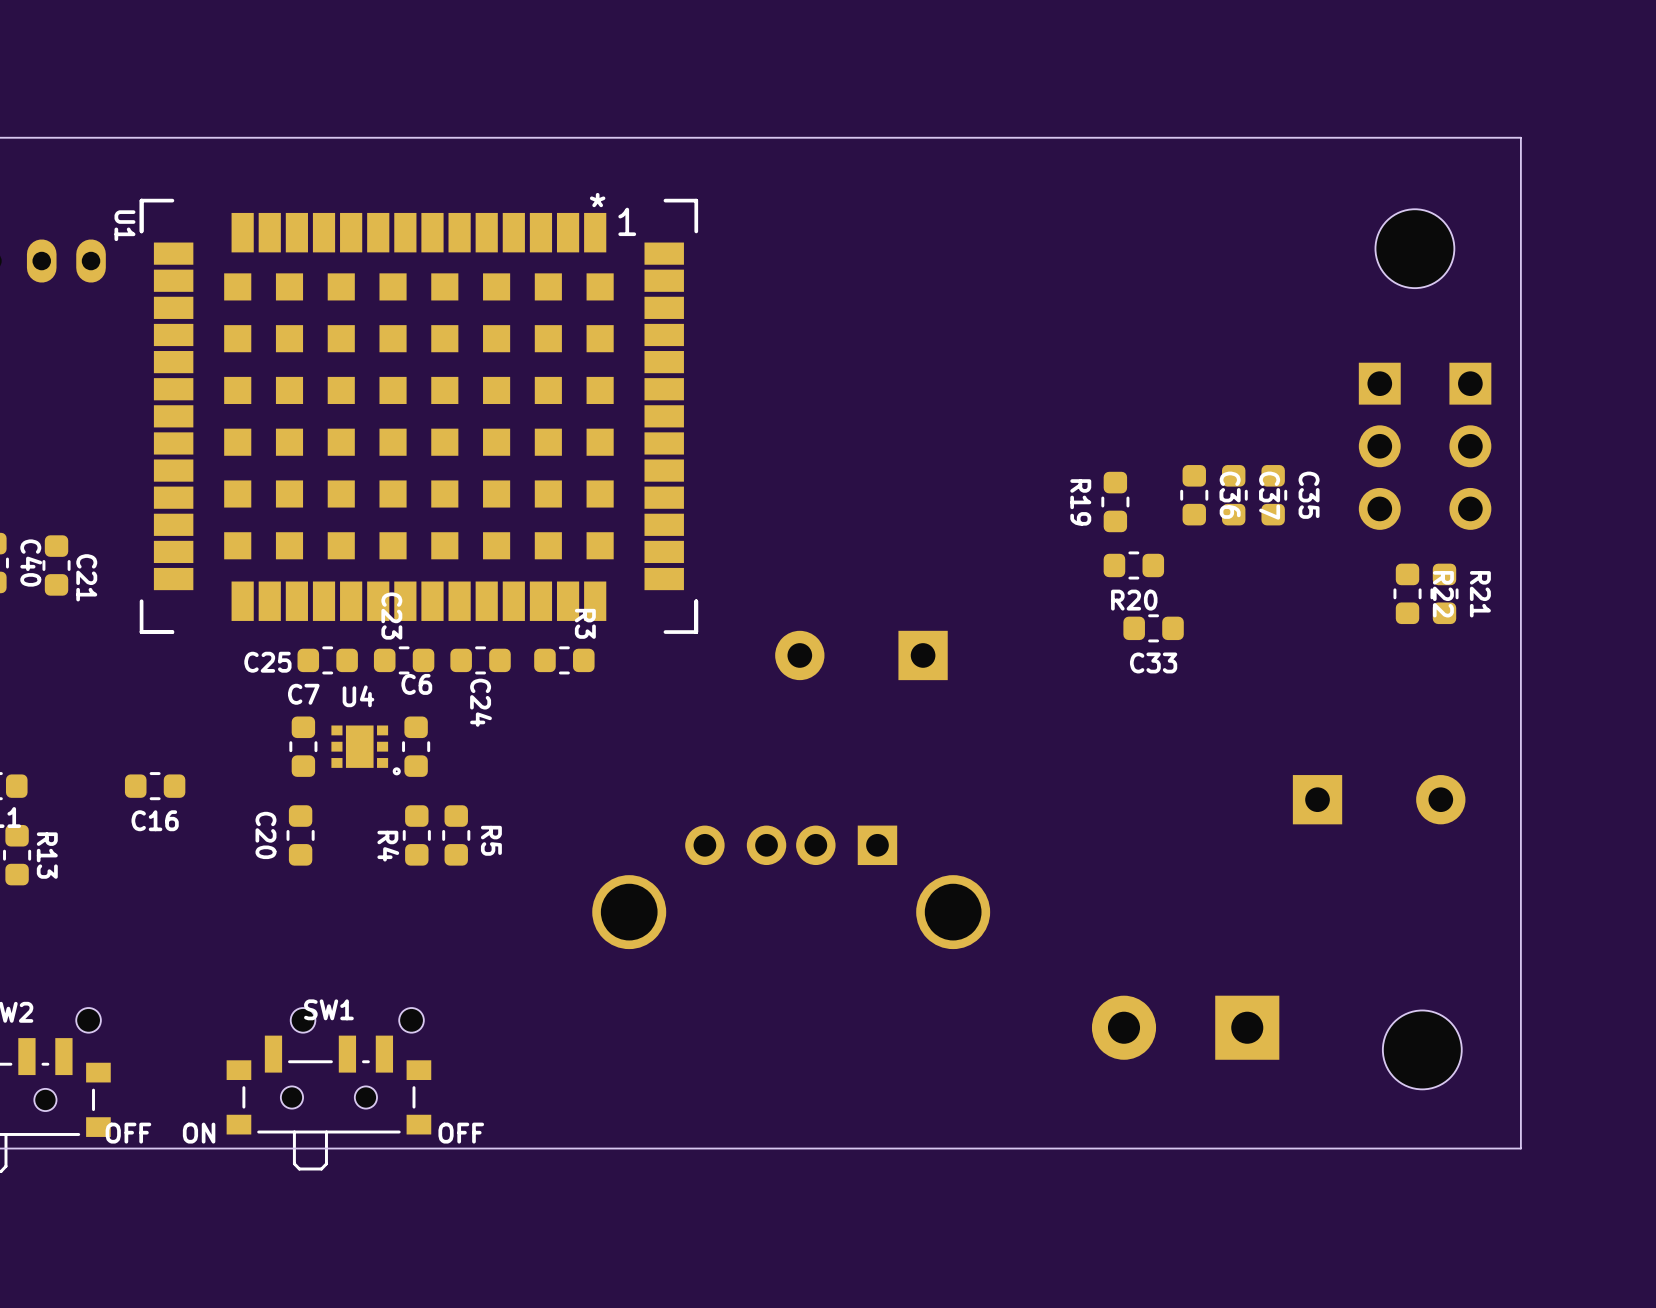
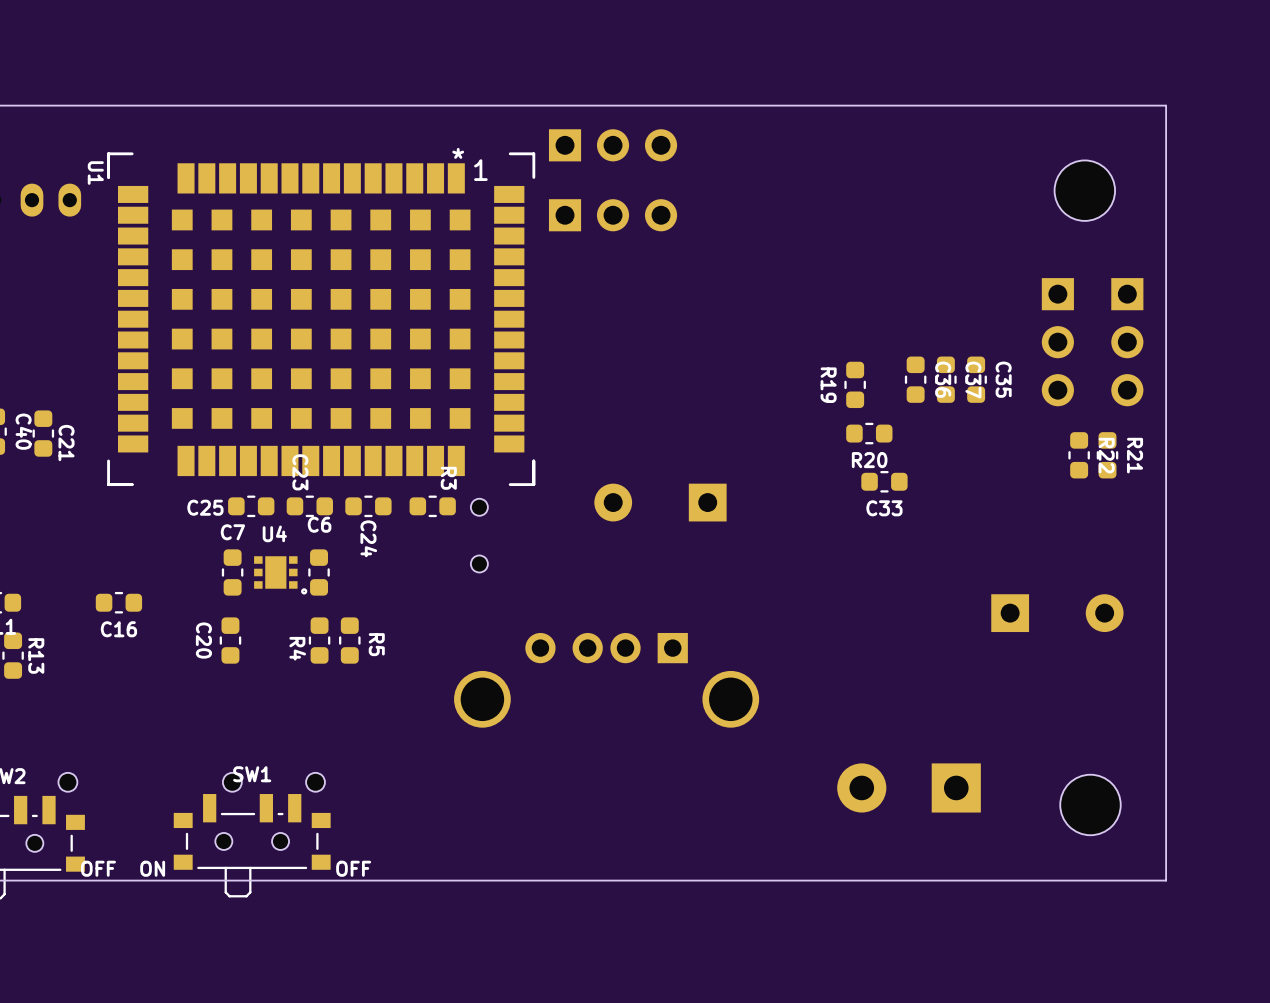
part: none -> (613, 145)
part: none -> (613, 215)
part: none -> (479, 535)

